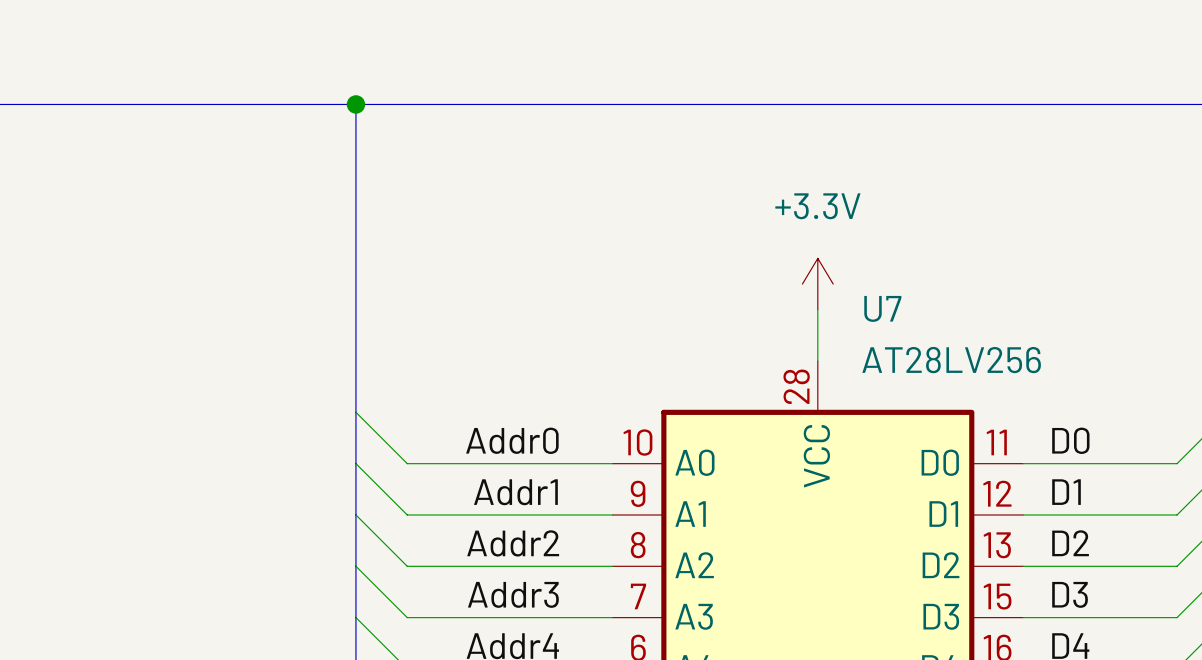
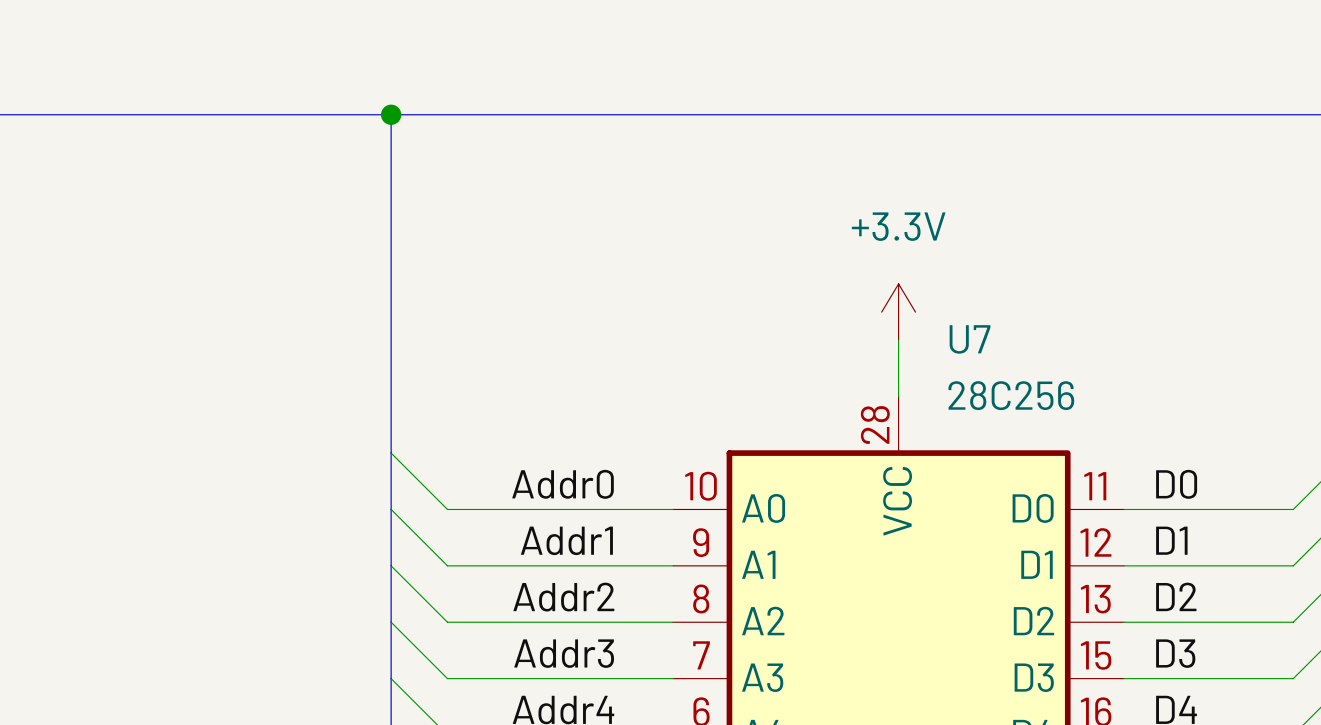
U7 value: AT28LV256 (951, 360) -> 28C256 (1011, 395)

